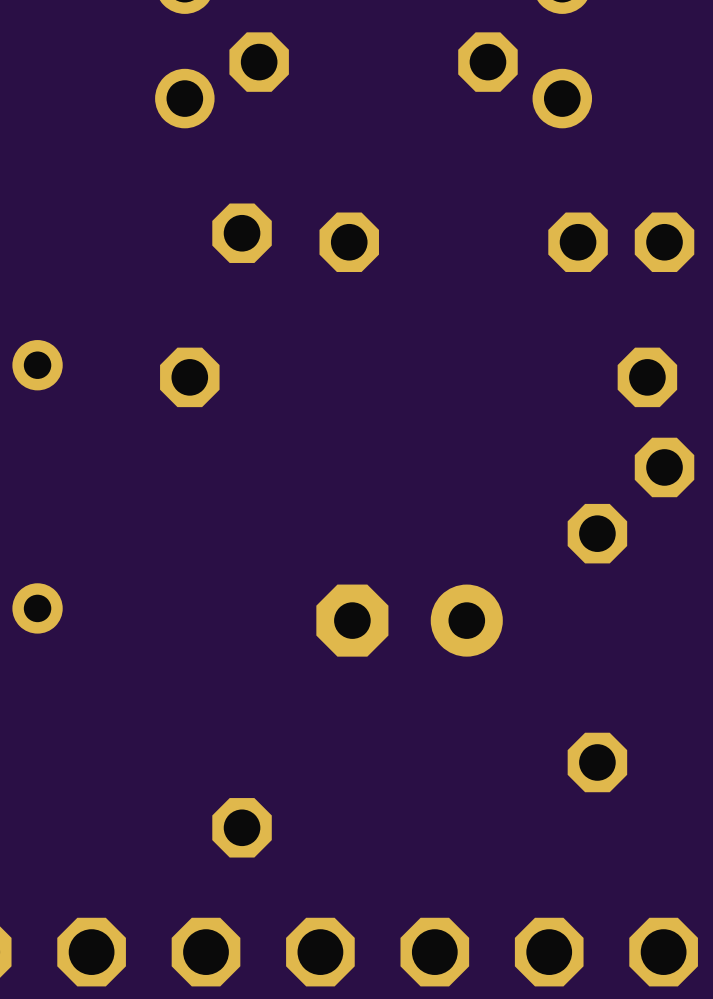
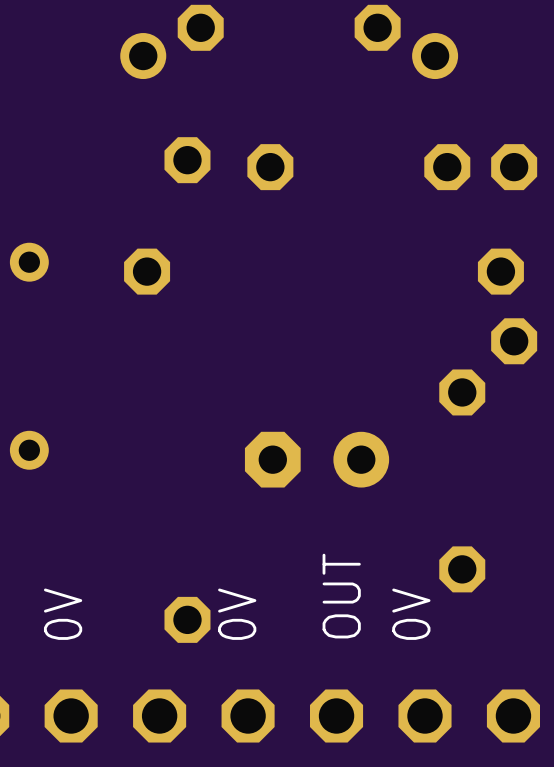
text: none -> OUT (341, 596)
text: none -> 0V (63, 614)
text: none -> 0V (237, 614)
text: none -> 0V (411, 614)

